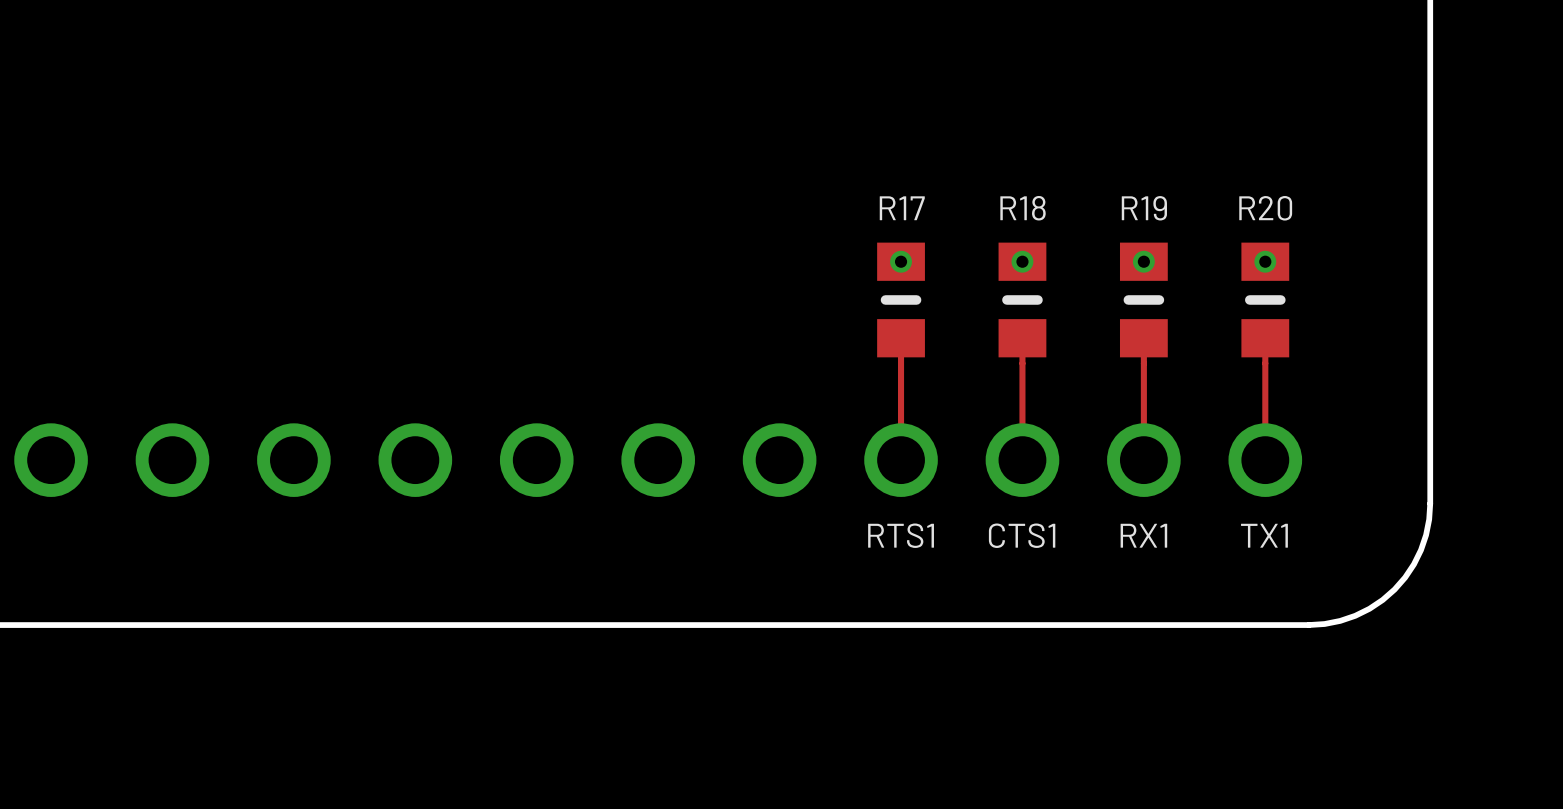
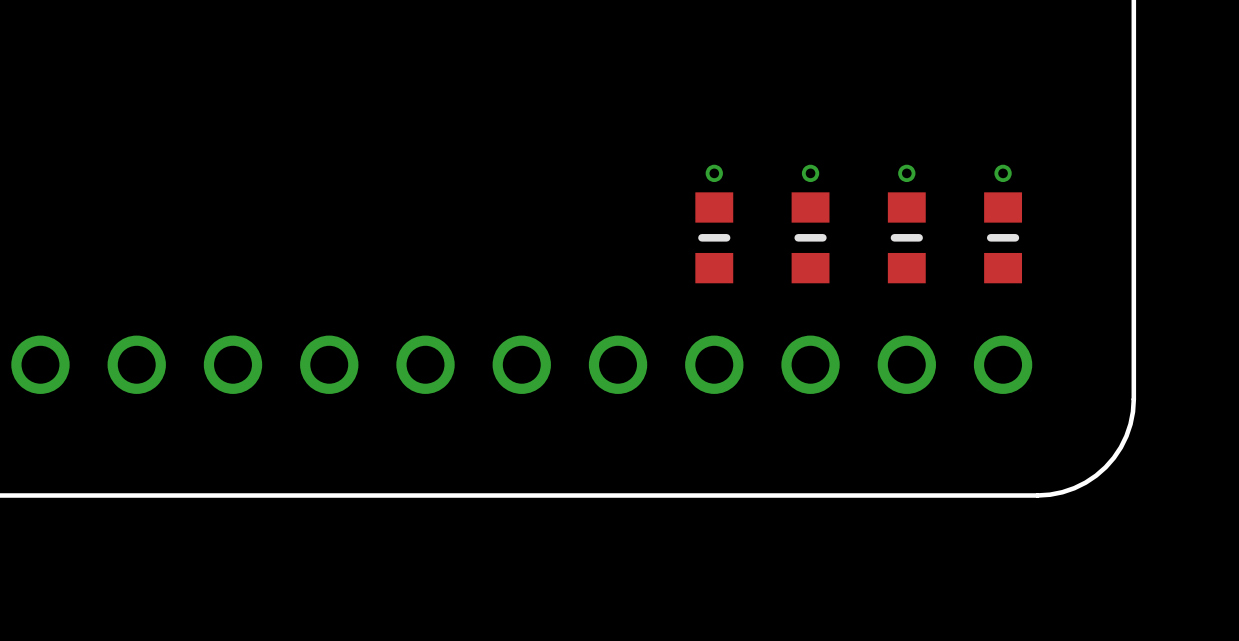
text: R17 (902, 208) -> none
text: R18 (1023, 208) -> none
text: R19 (1144, 208) -> none
text: R20 (1265, 208) -> none
via position: (901, 261) -> (714, 173)
via position: (1022, 261) -> (810, 173)
via position: (1143, 261) -> (906, 173)
via position: (1265, 261) -> (1003, 173)
track: (901, 338) (901, 460) -> none
track: (1022, 338) (1022, 460) -> none
track: (1143, 338) (1143, 460) -> none
track: (1265, 338) (1265, 460) -> none
text: RTS1 (901, 535) -> none
text: CTS1 (1022, 535) -> none
text: RX1 (1143, 535) -> none
text: TX1 (1264, 535) -> none

